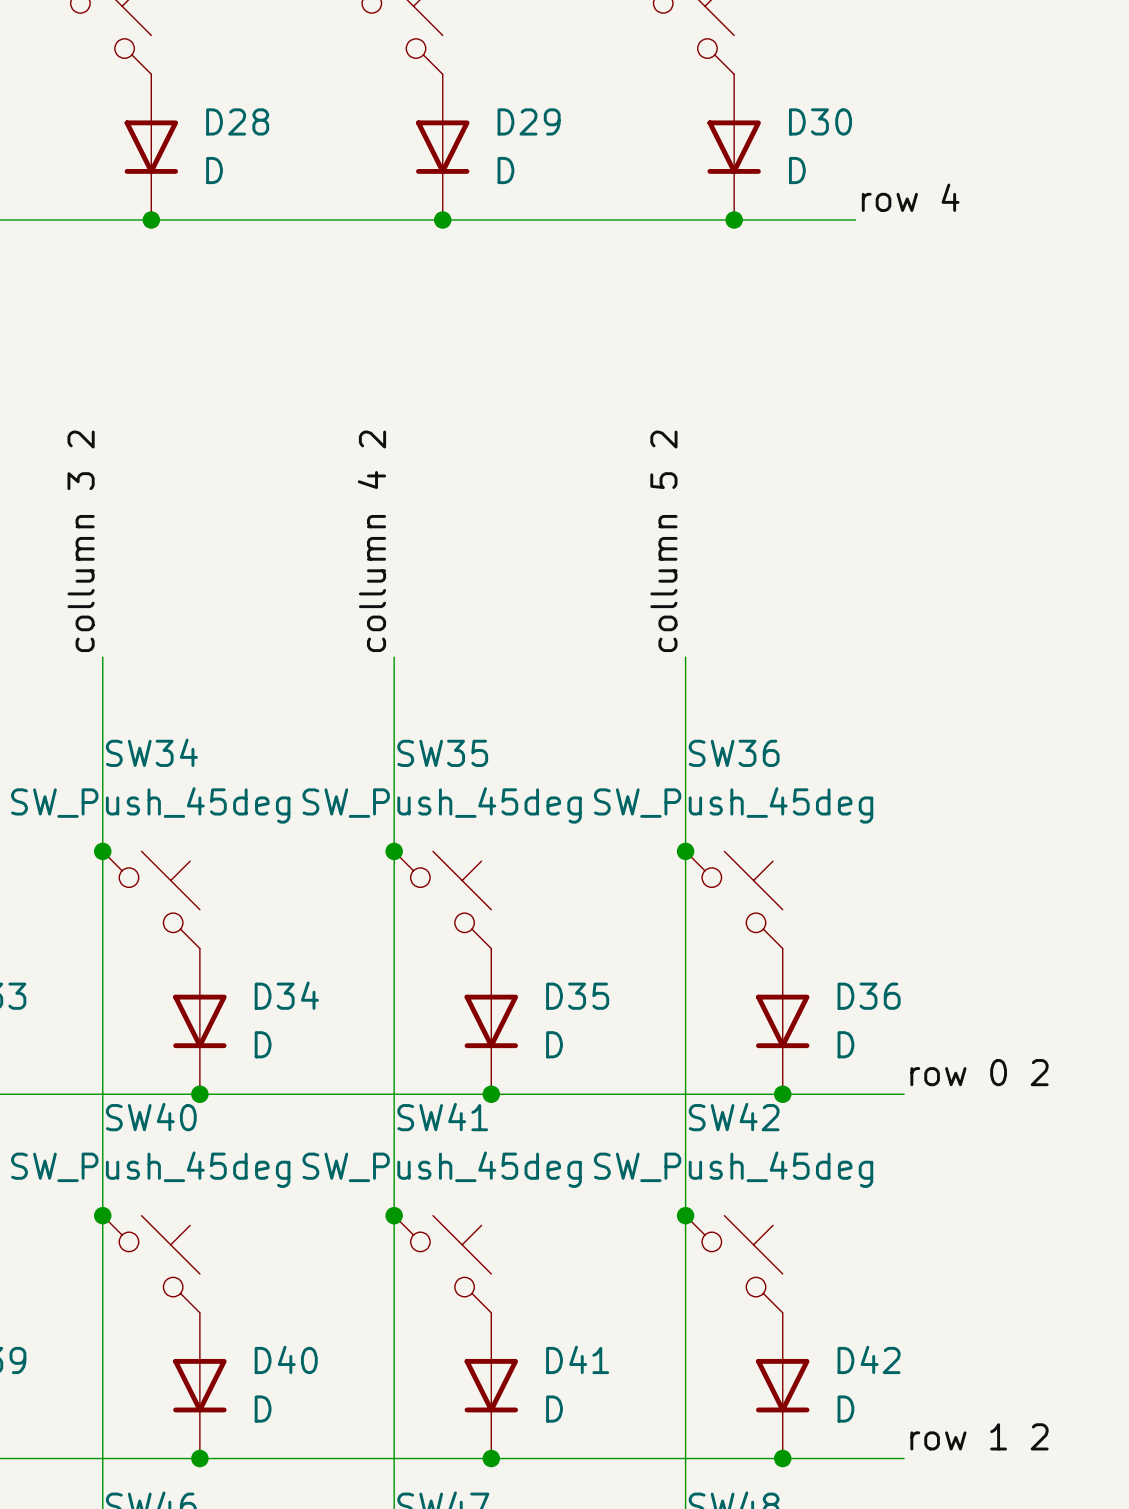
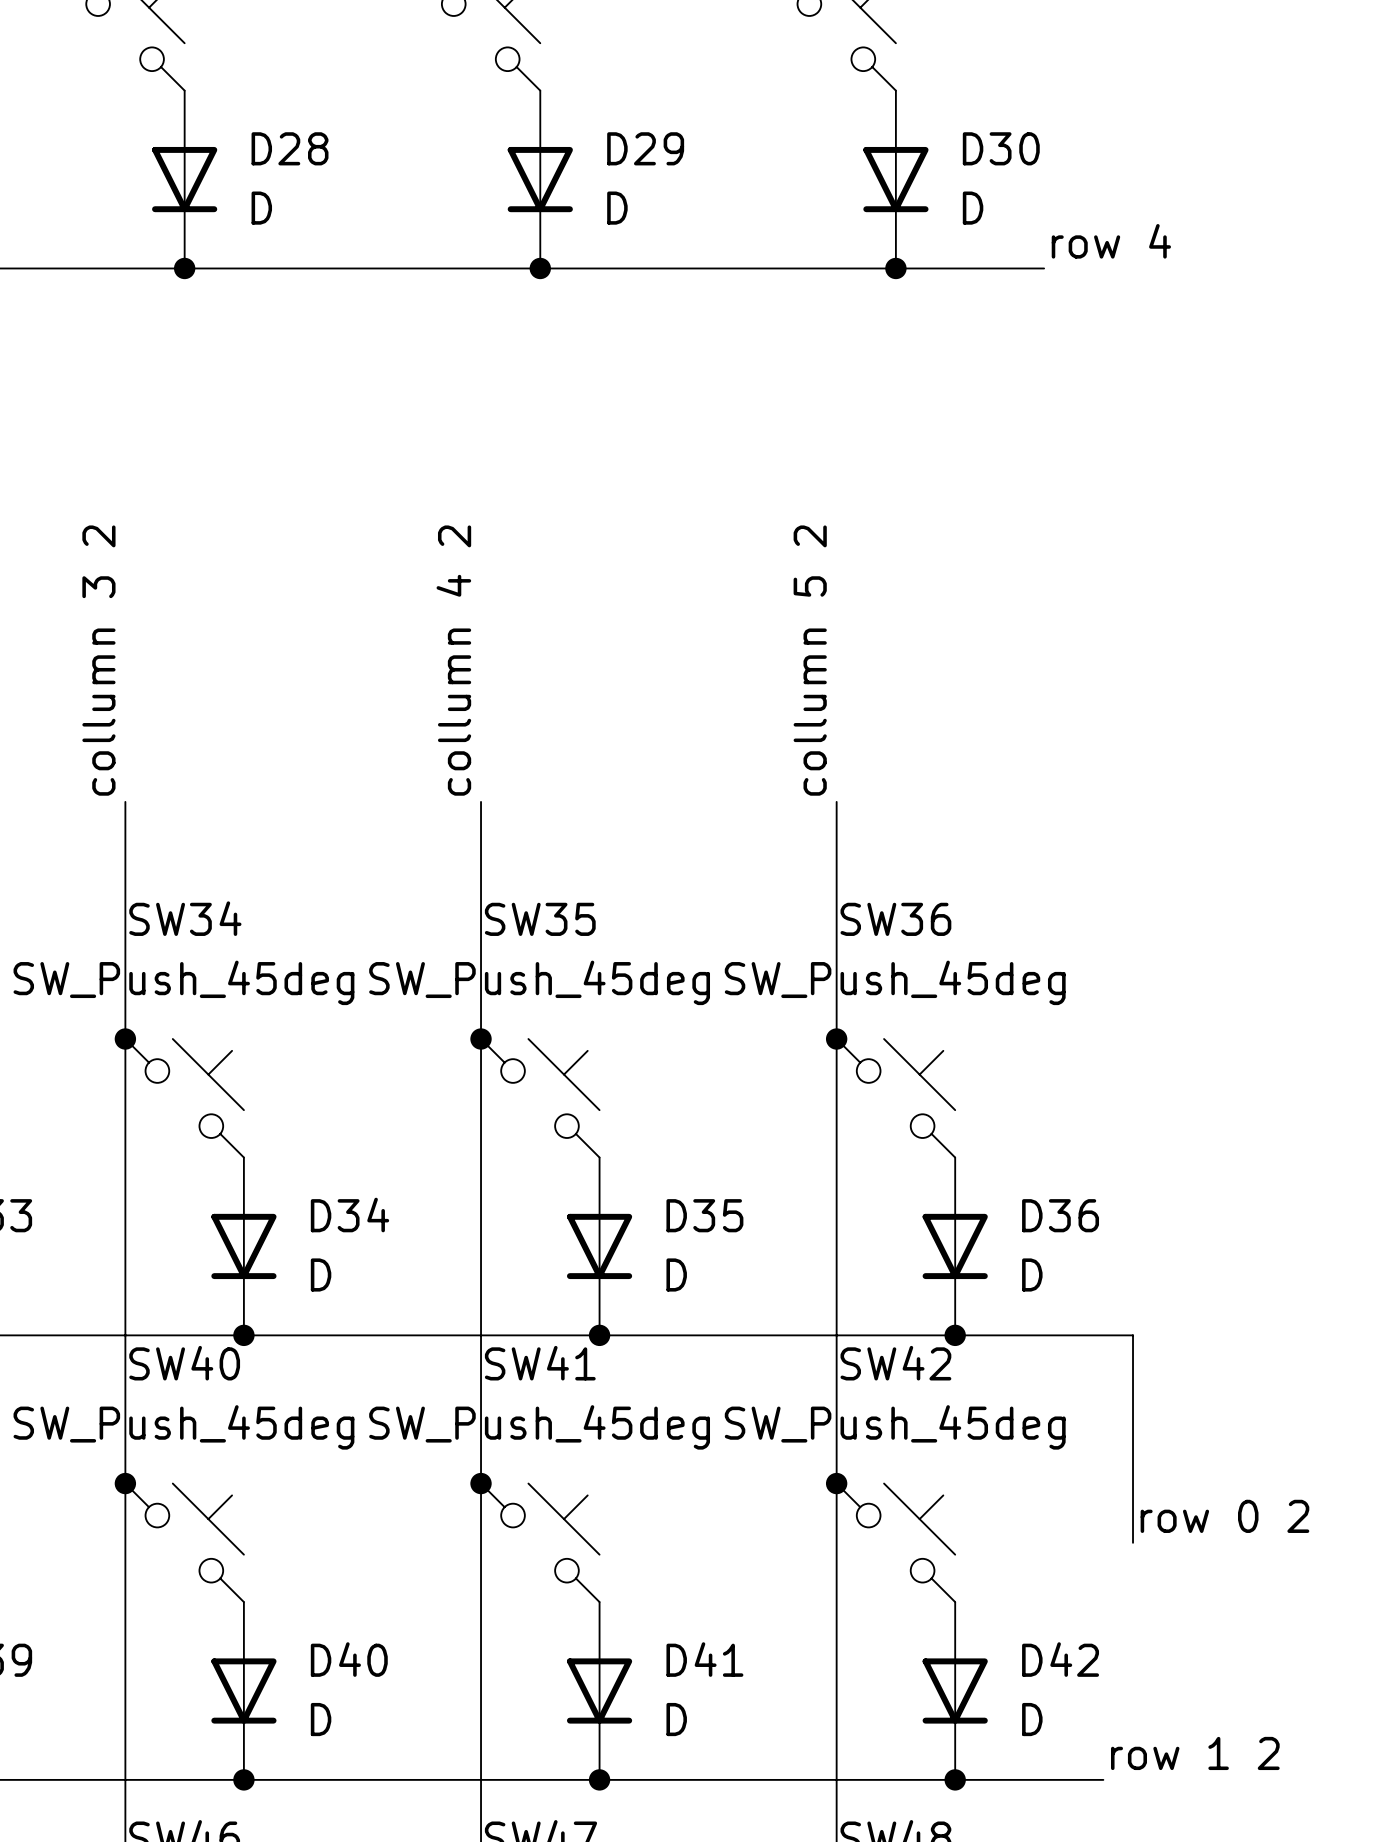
label position: row 0 2 (979, 1072) -> row 0 2 (1224, 1516)
wire: none -> (1103, 1335) (1133, 1335) (1133, 1542)

